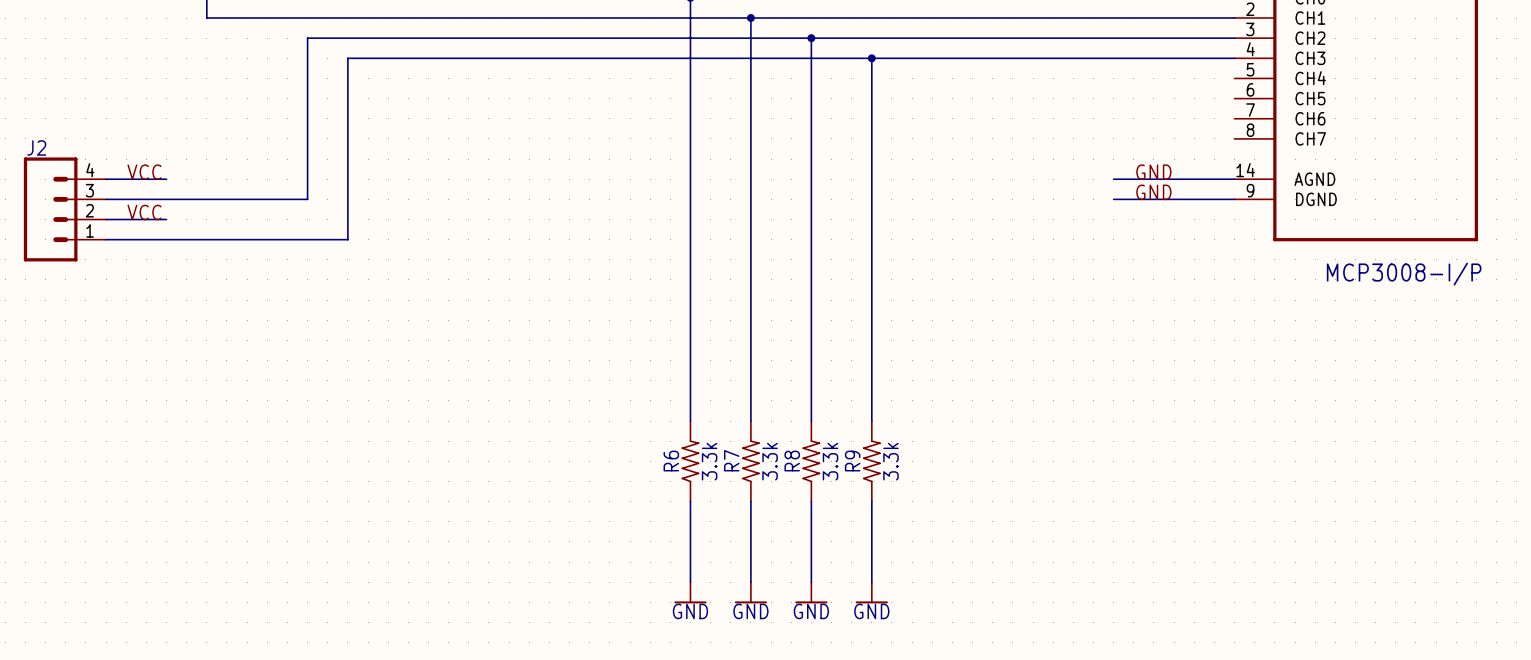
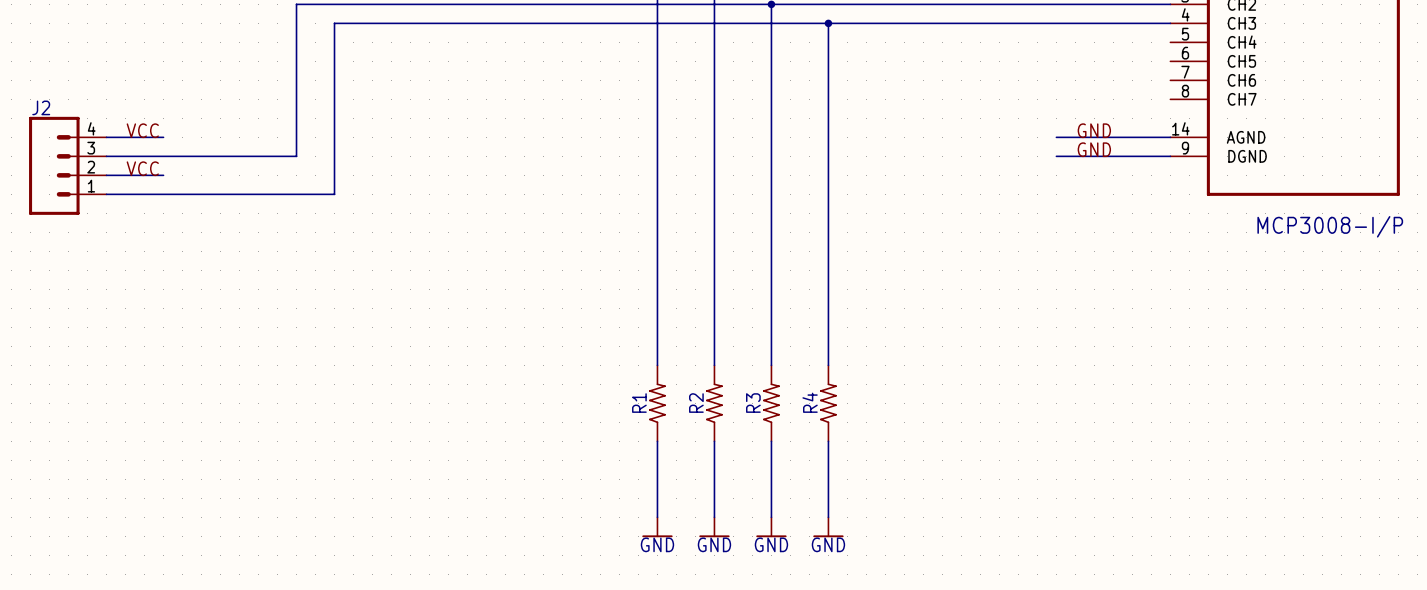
R7 name: R7 (731, 460) -> R2 (696, 403)
R6 name: R6 (671, 461) -> R1 (639, 403)
R6 value: 3.3k (709, 461) -> none
R7 value: 3.3k (770, 461) -> none
R8 name: R8 (792, 461) -> R3 (753, 403)
R8 value: 3.3k (830, 461) -> none
R9 name: R9 (852, 461) -> R4 (810, 402)
R9 value: 3.3k (890, 461) -> none

